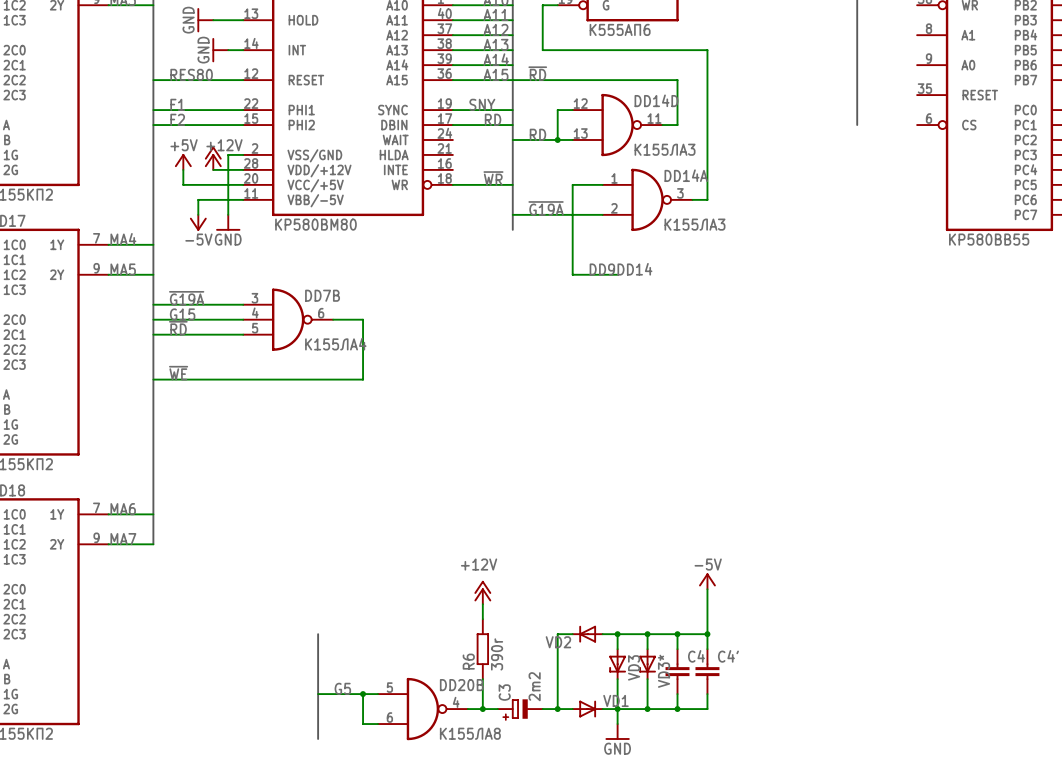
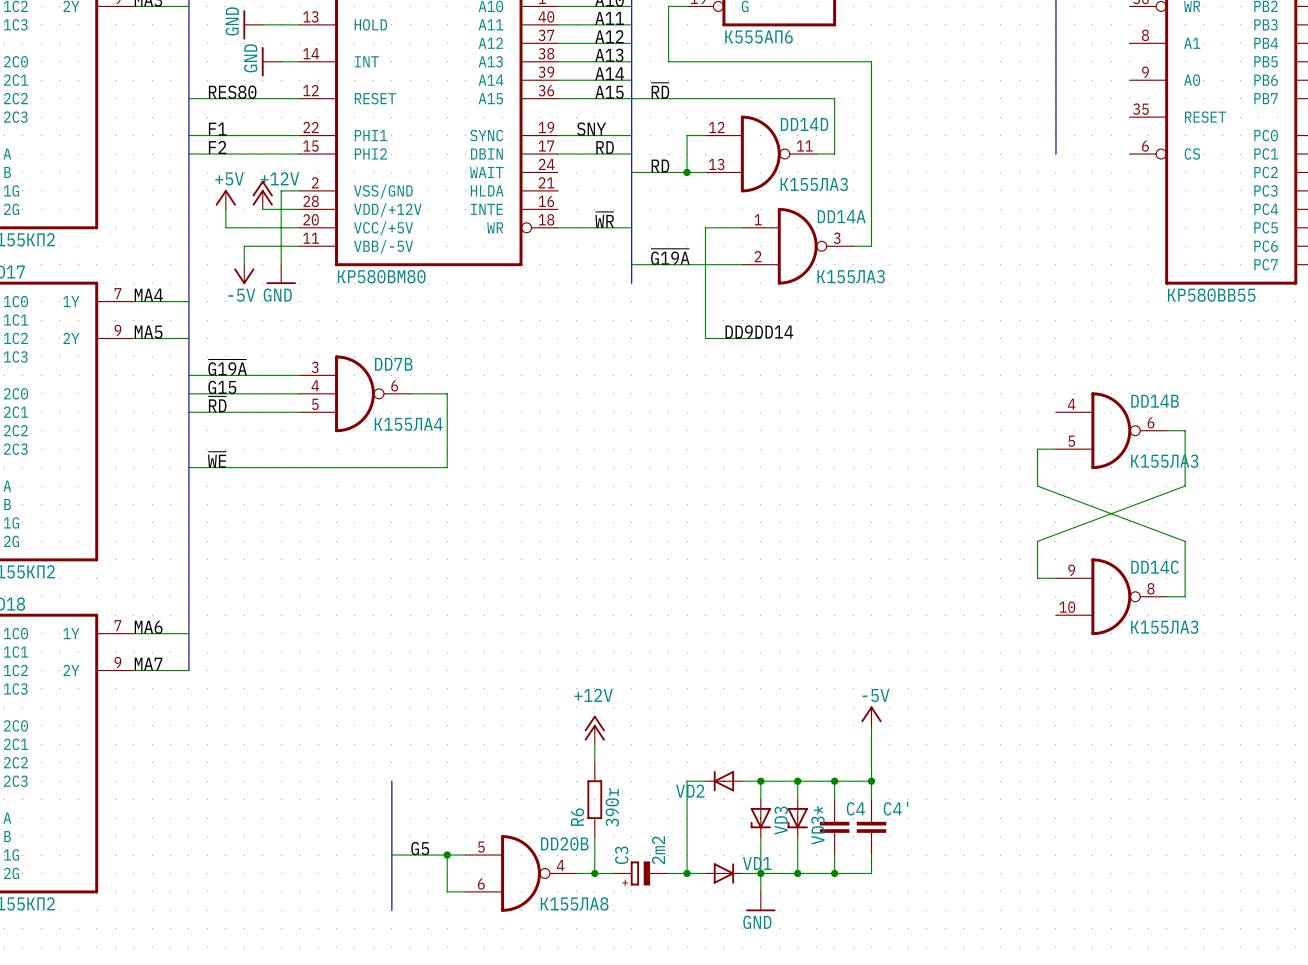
DD14B: none -> К155ЛА3 (1111, 430)
wire: none -> (1166, 430) (1185, 430) (1185, 486) (1037, 541) (1037, 578) (1055, 578)
wire: none -> (1055, 449) (1037, 449) (1037, 486) (1185, 541) (1185, 596) (1166, 596)
DD14C: none -> К155ЛА3 (1111, 596)

